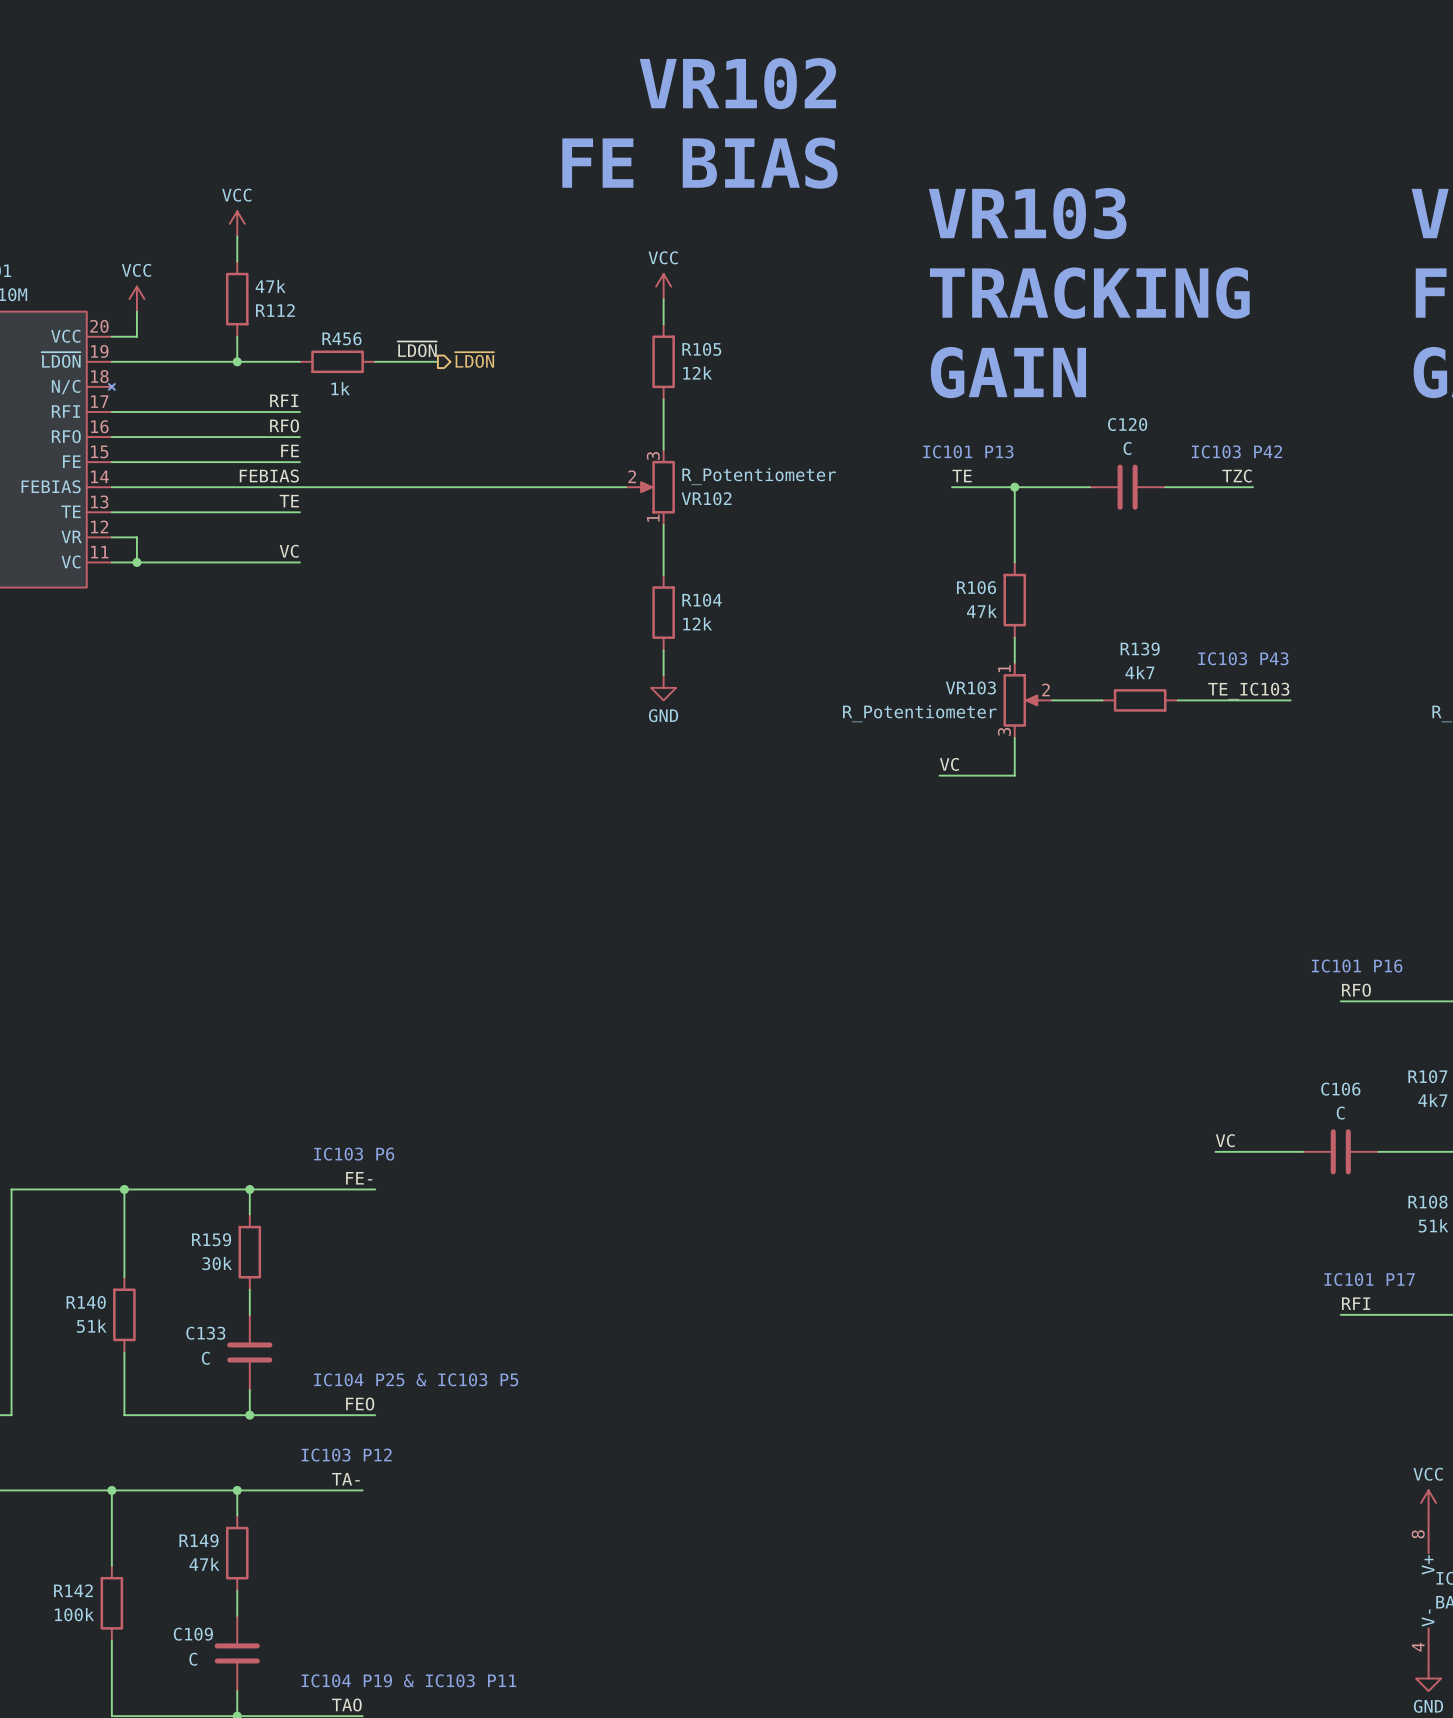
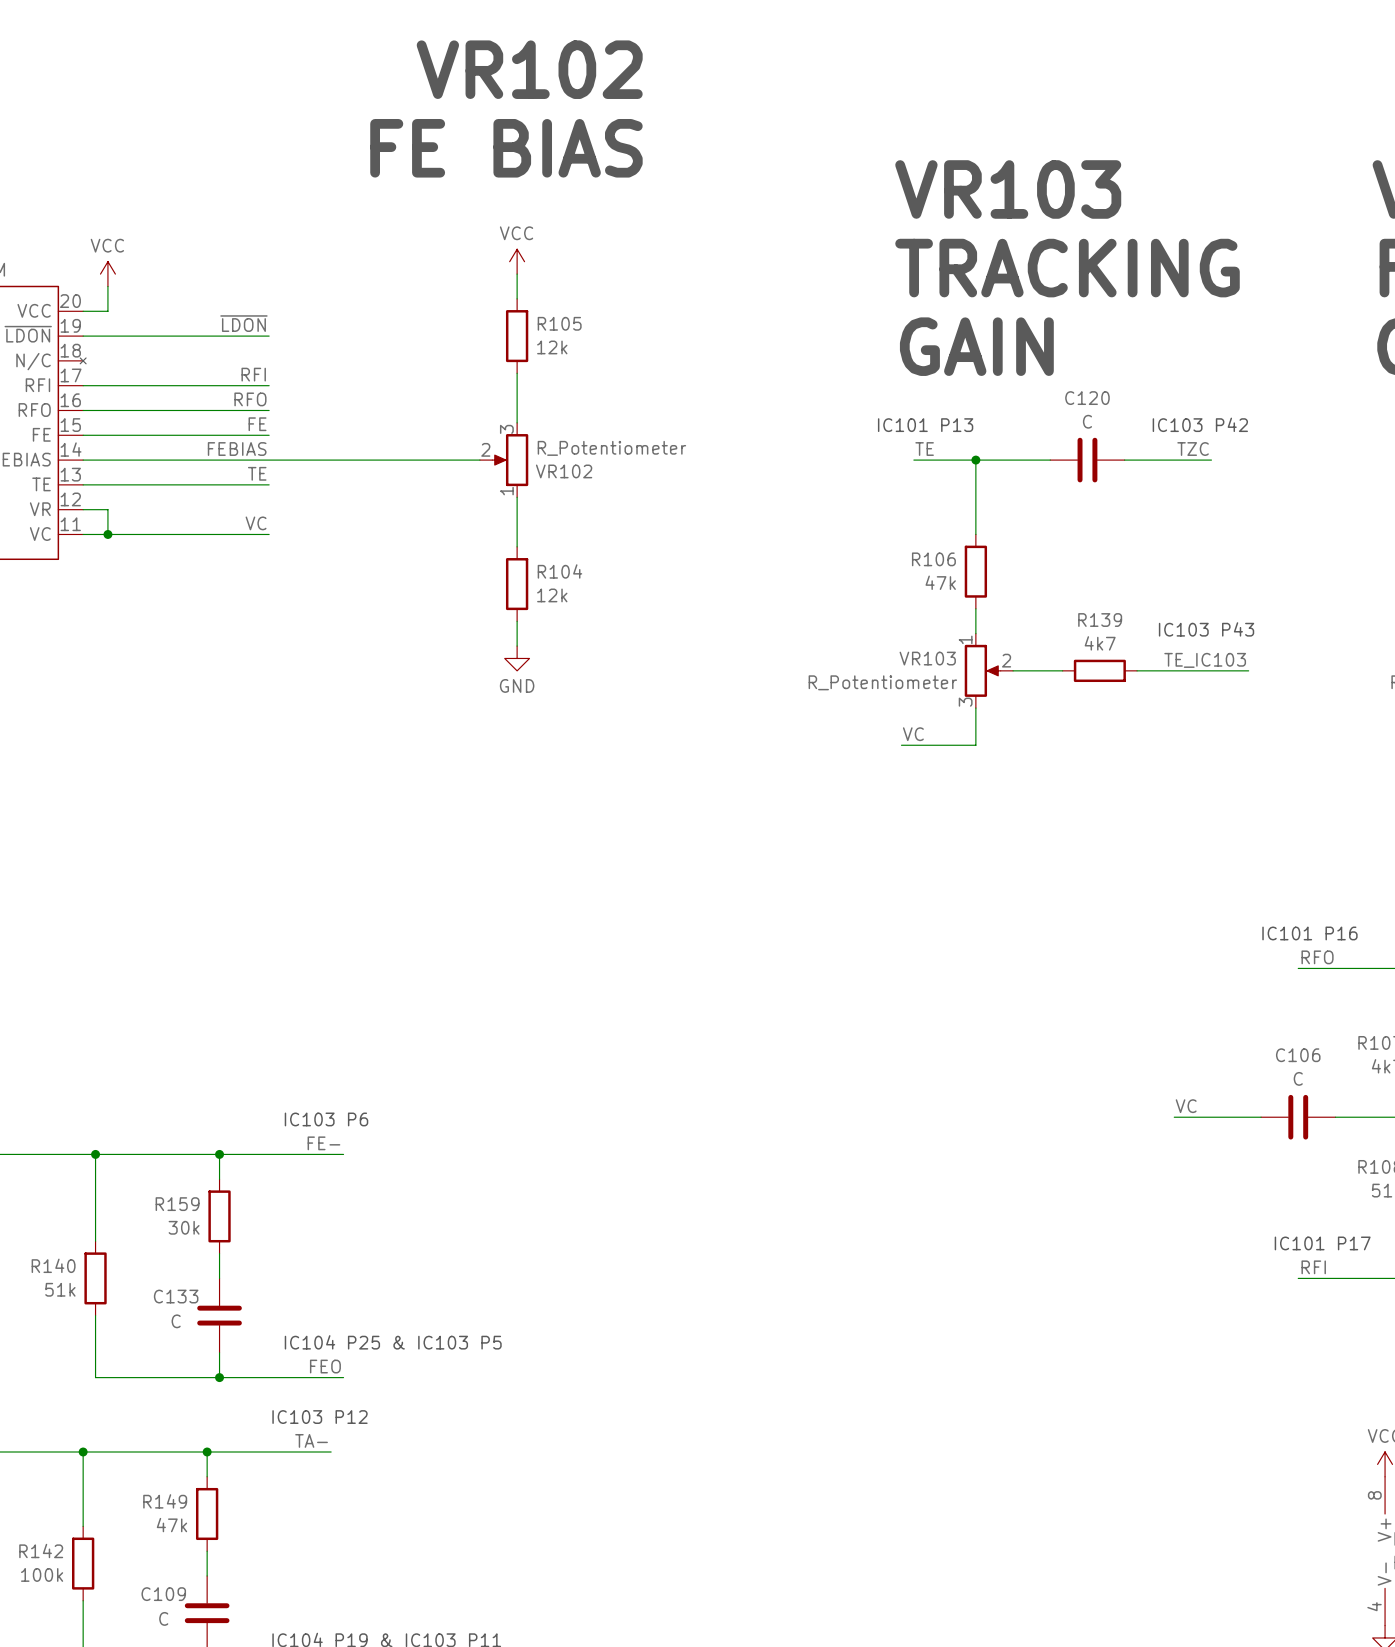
text position: VR102 (737, 83) -> VR102 (529, 69)
text position: FE BIAS (699, 163) -> FE BIAS (506, 148)
power symbol: VCC (237, 223) -> none
wire: (237, 236) (237, 261) -> none
power symbol position: VCC (663, 286) -> VCC (517, 261)
R112: 47k (237, 299) -> none
wire: (663, 299) (663, 324) -> (517, 274) (517, 298)
wire: (237, 336) (237, 361) -> none
label position: ~{LDON} (417, 349) -> ~{LDON} (243, 323)
hierarchical label: ~{LDON} (474, 360) -> none
junction: (237, 361) -> none
R456: 1k (337, 361) -> none
wire: (375, 361) (437, 361) -> none
R105 position: (663, 361) -> (517, 336)
wire: (663, 399) (663, 449) -> (517, 373) (517, 422)
wire: (513, 487) (626, 487) -> none
VR102 position: (650, 487) -> (504, 460)
wire: (663, 524) (663, 574) -> (517, 497) (517, 546)
R104 position: (663, 612) -> (517, 584)
wire: (663, 650) (663, 675) -> (517, 621) (517, 646)
power symbol position: GND (663, 687) -> GND (517, 658)

